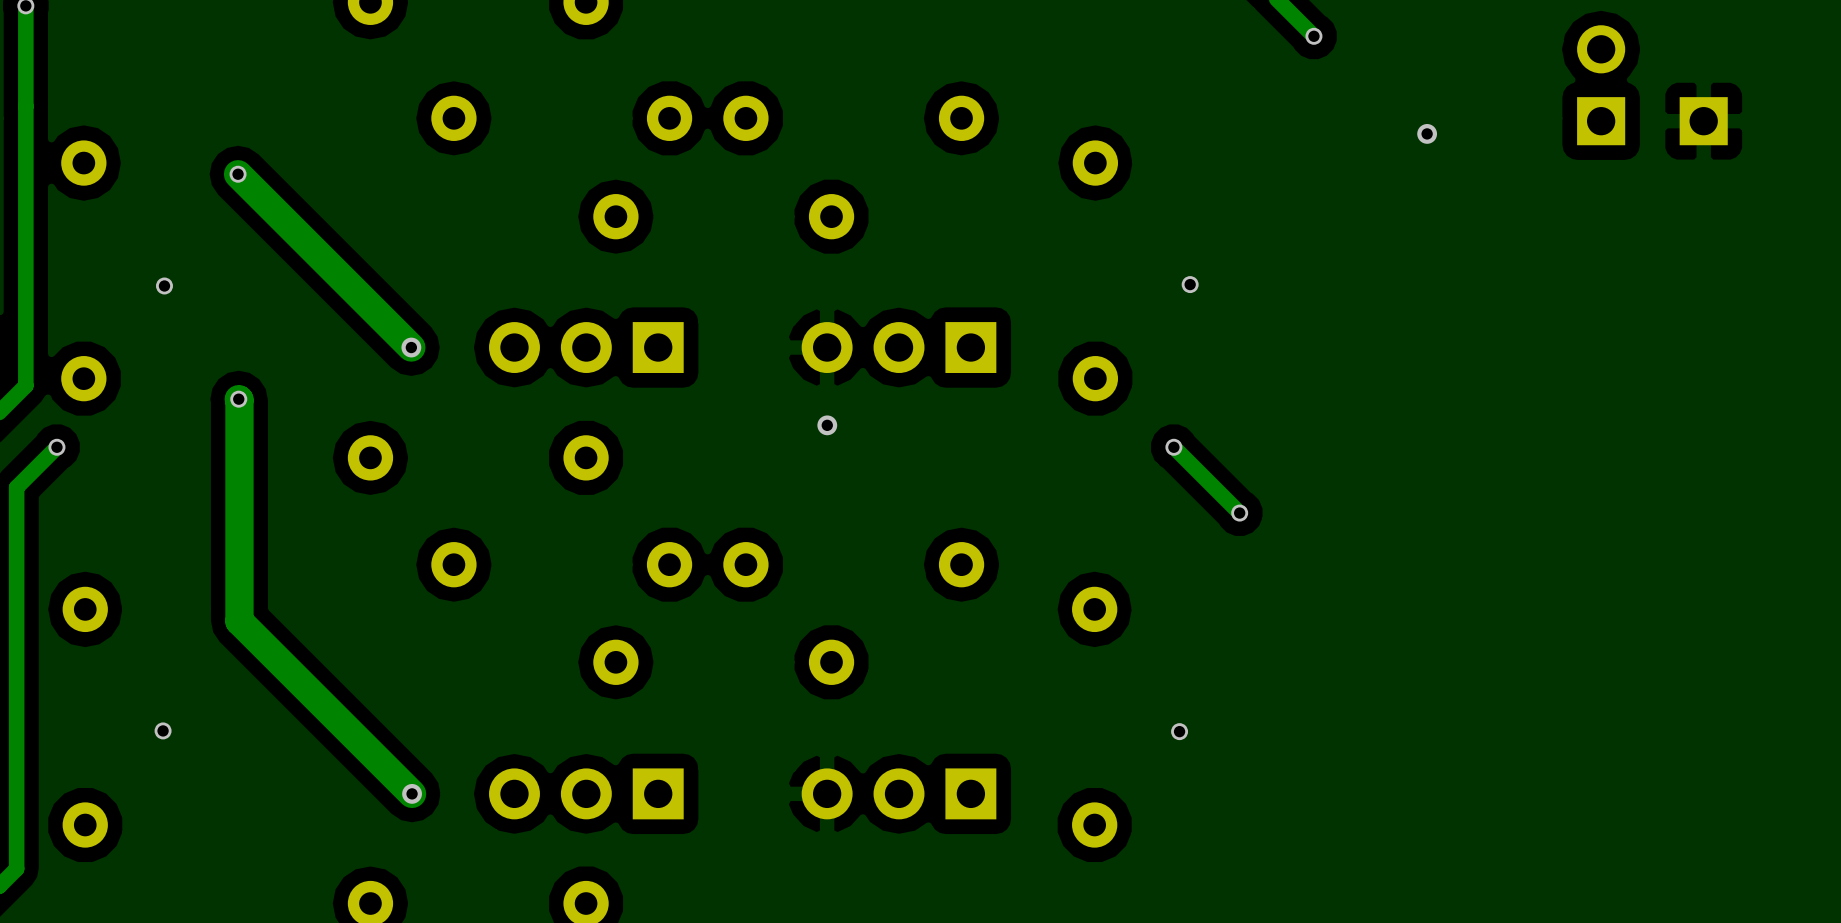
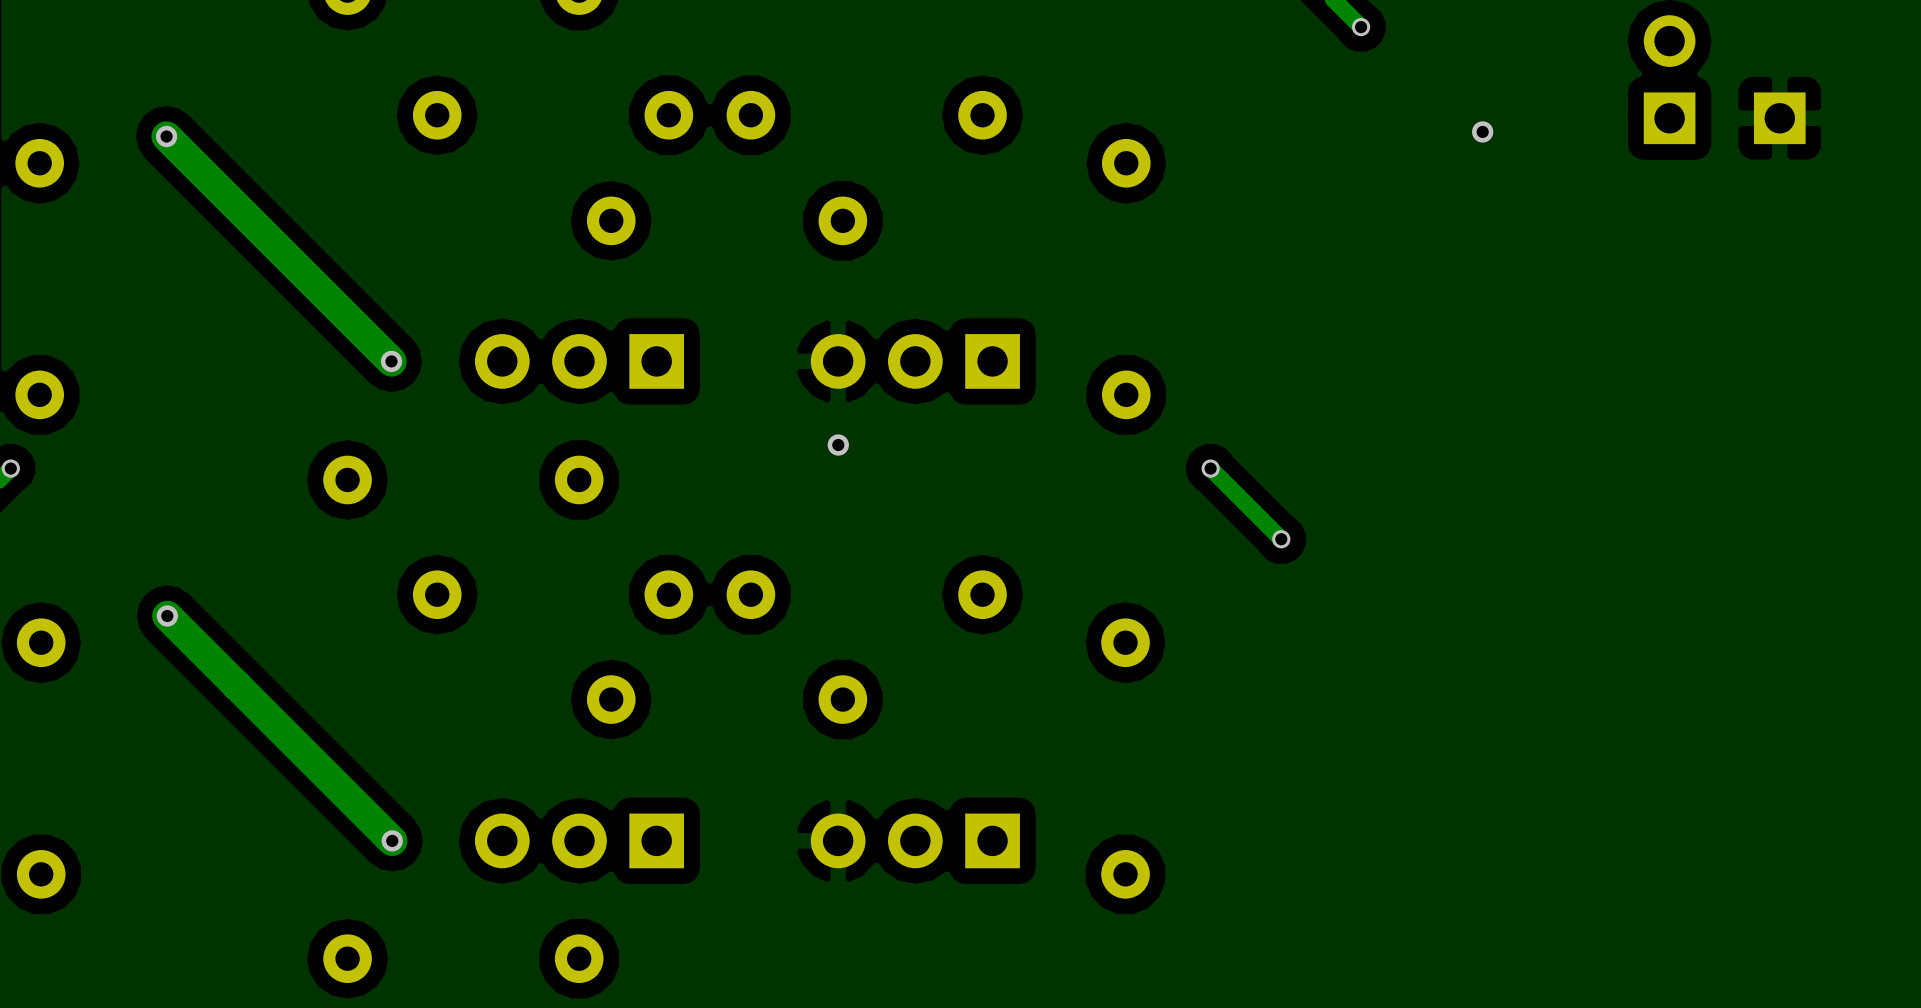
track: none -> (166, 136) (205, 175)
via: none -> (166, 136)
via: (238, 174) -> none
via: (1190, 284) -> none
via: (164, 285) -> none
track: (238, 399) (239, 621) -> (167, 615) (206, 655)
via: (238, 399) -> none
via: none -> (167, 615)
via: (163, 730) -> none
via: (1179, 731) -> none

